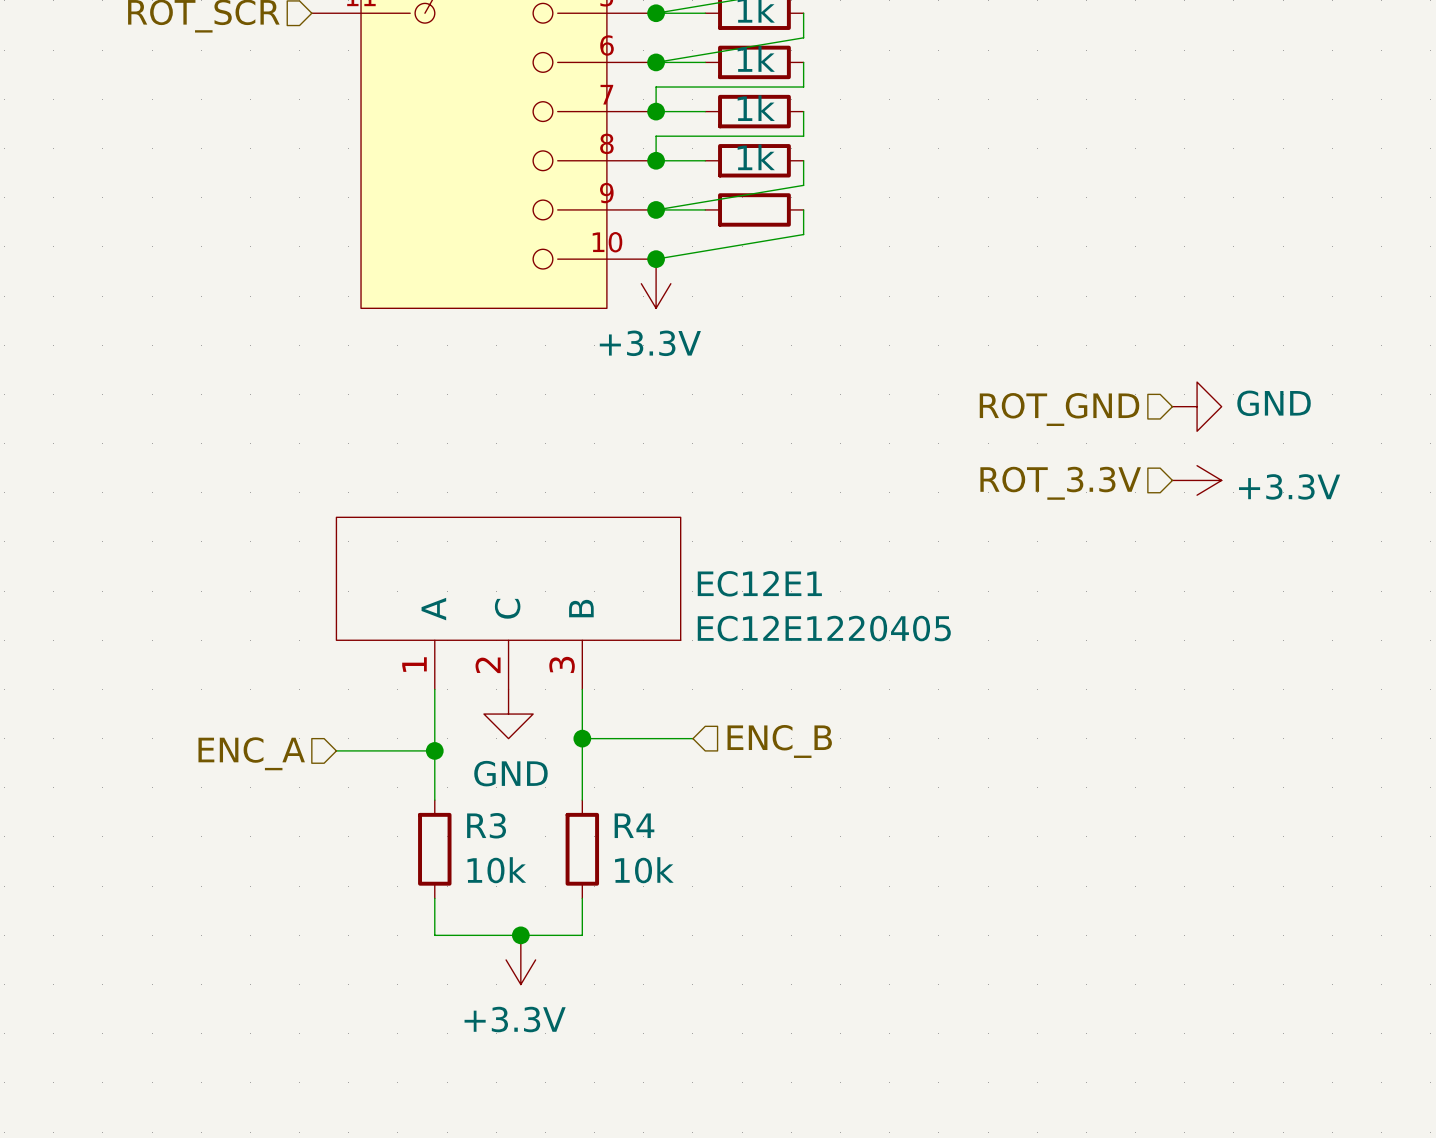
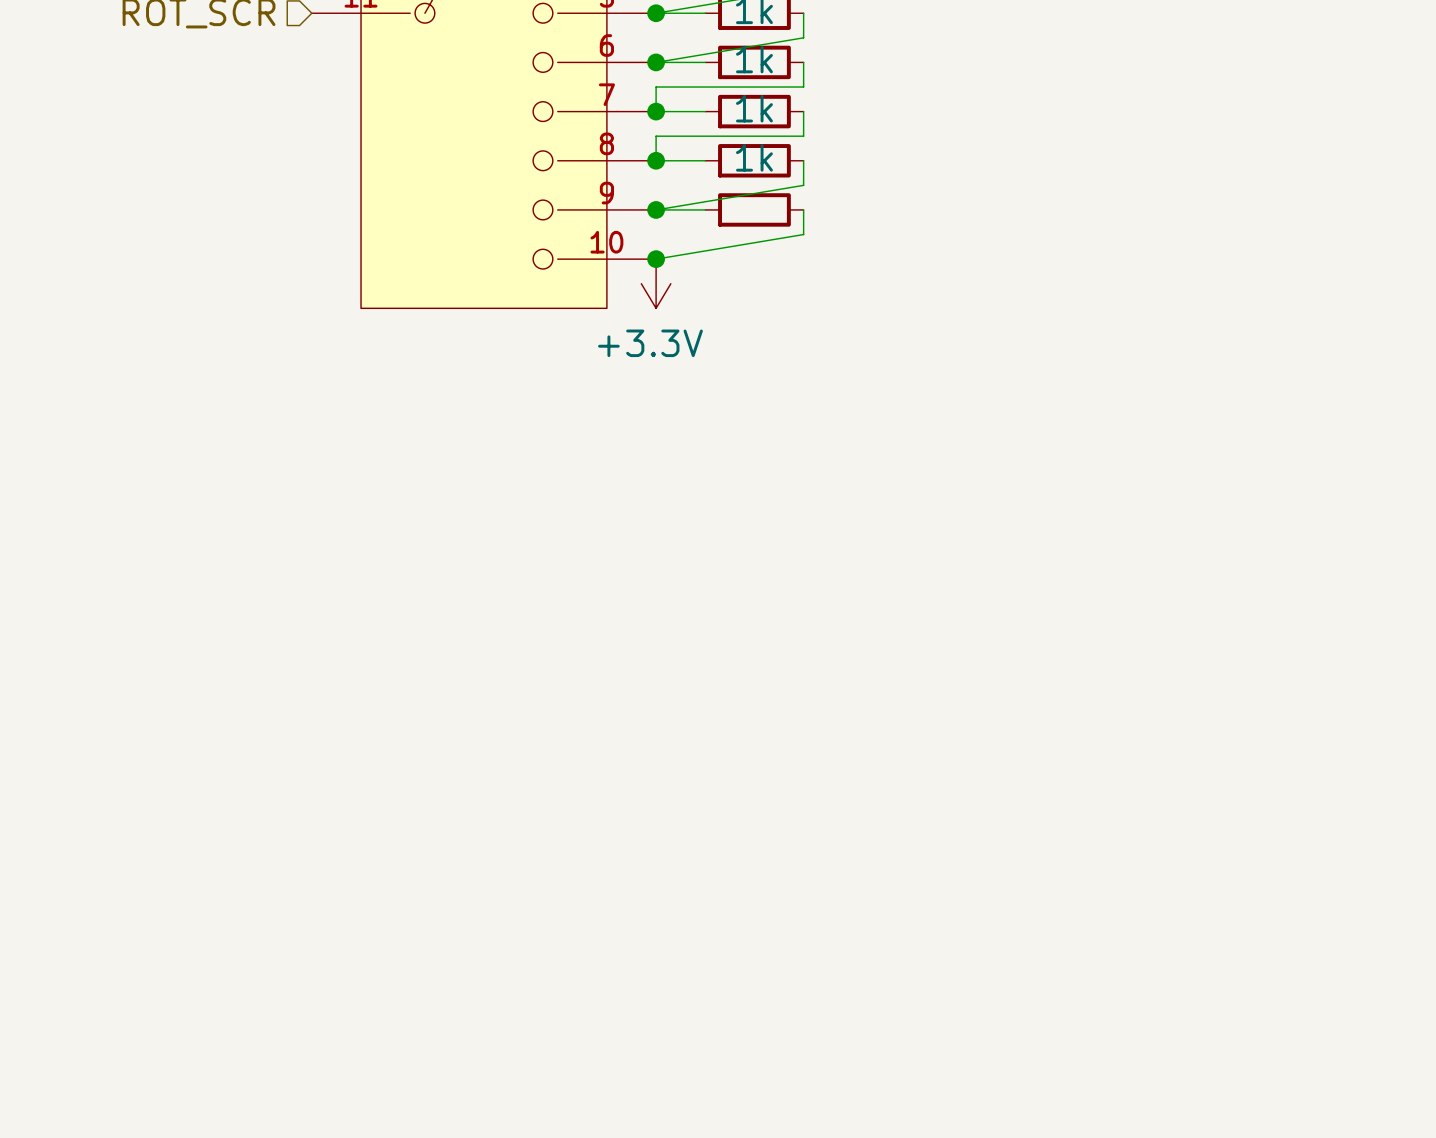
power symbol: GND (1197, 406) -> none
hierarchical label: ROT_GND (1059, 409) -> none
power symbol: +3.3V (1197, 480) -> none
hierarchical label: ROT_3.3V (1060, 483) -> none
EC12E1: EC12E1220405 (508, 603) -> none
wire: (434, 689) (434, 800) -> none
wire: (582, 689) (582, 800) -> none
power symbol: GND (508, 714) -> none
wire: (582, 738) (692, 738) -> none
junction: (582, 738) -> none
hierarchical label: ENC_B (779, 741) -> none
wire: (336, 750) (434, 750) -> none
junction: (434, 750) -> none
hierarchical label: ENC_A (251, 753) -> none
R3: 10k (434, 849) -> none
R4: 10k (582, 849) -> none
wire: (434, 898) (434, 935) (582, 935) (582, 898) -> none
junction: (520, 935) -> none
power symbol: +3.3V (520, 959) -> none

